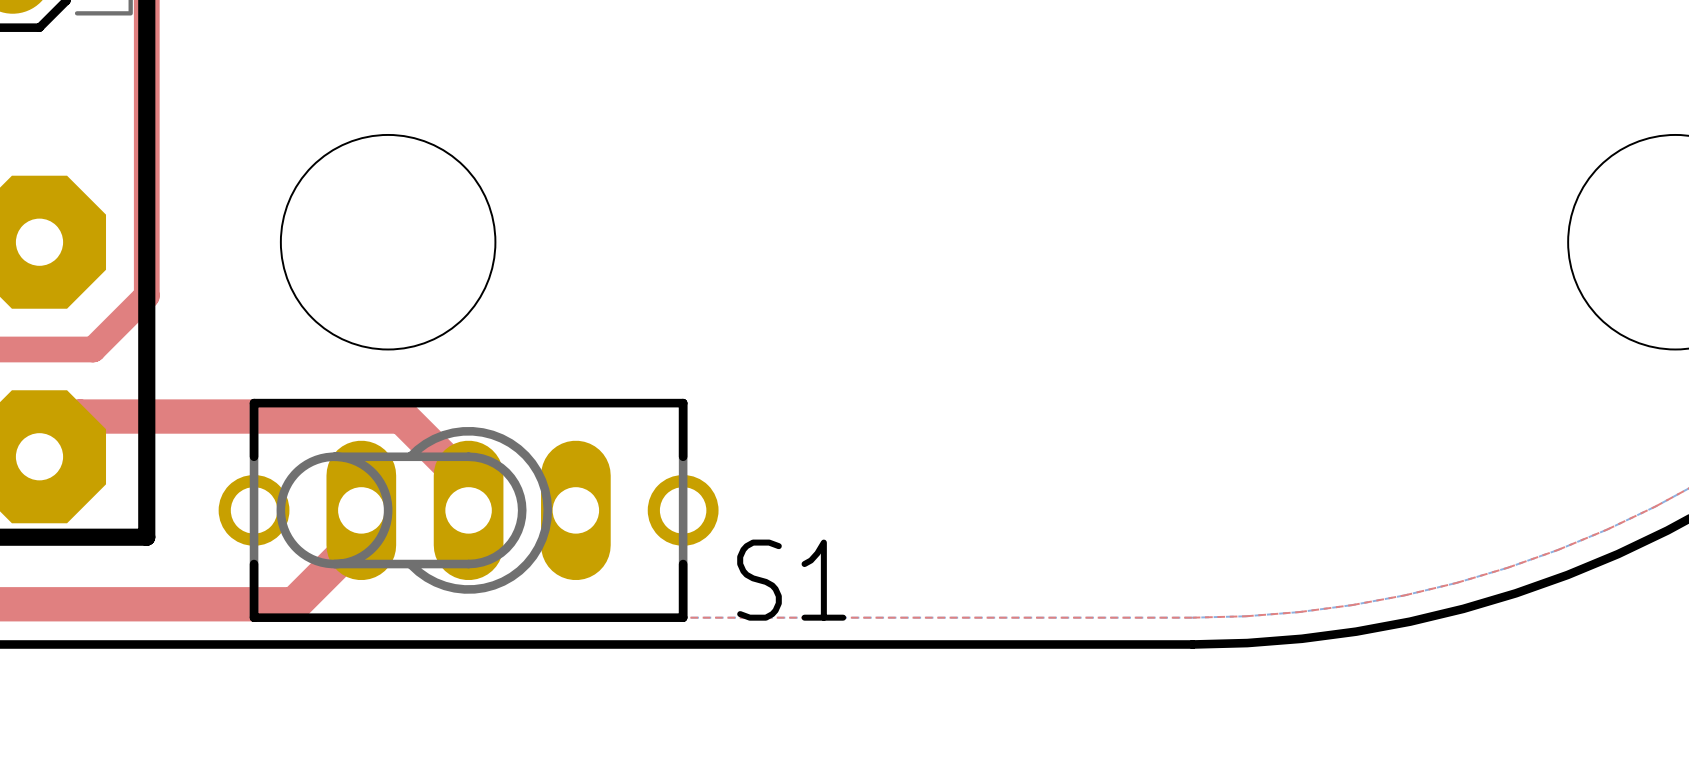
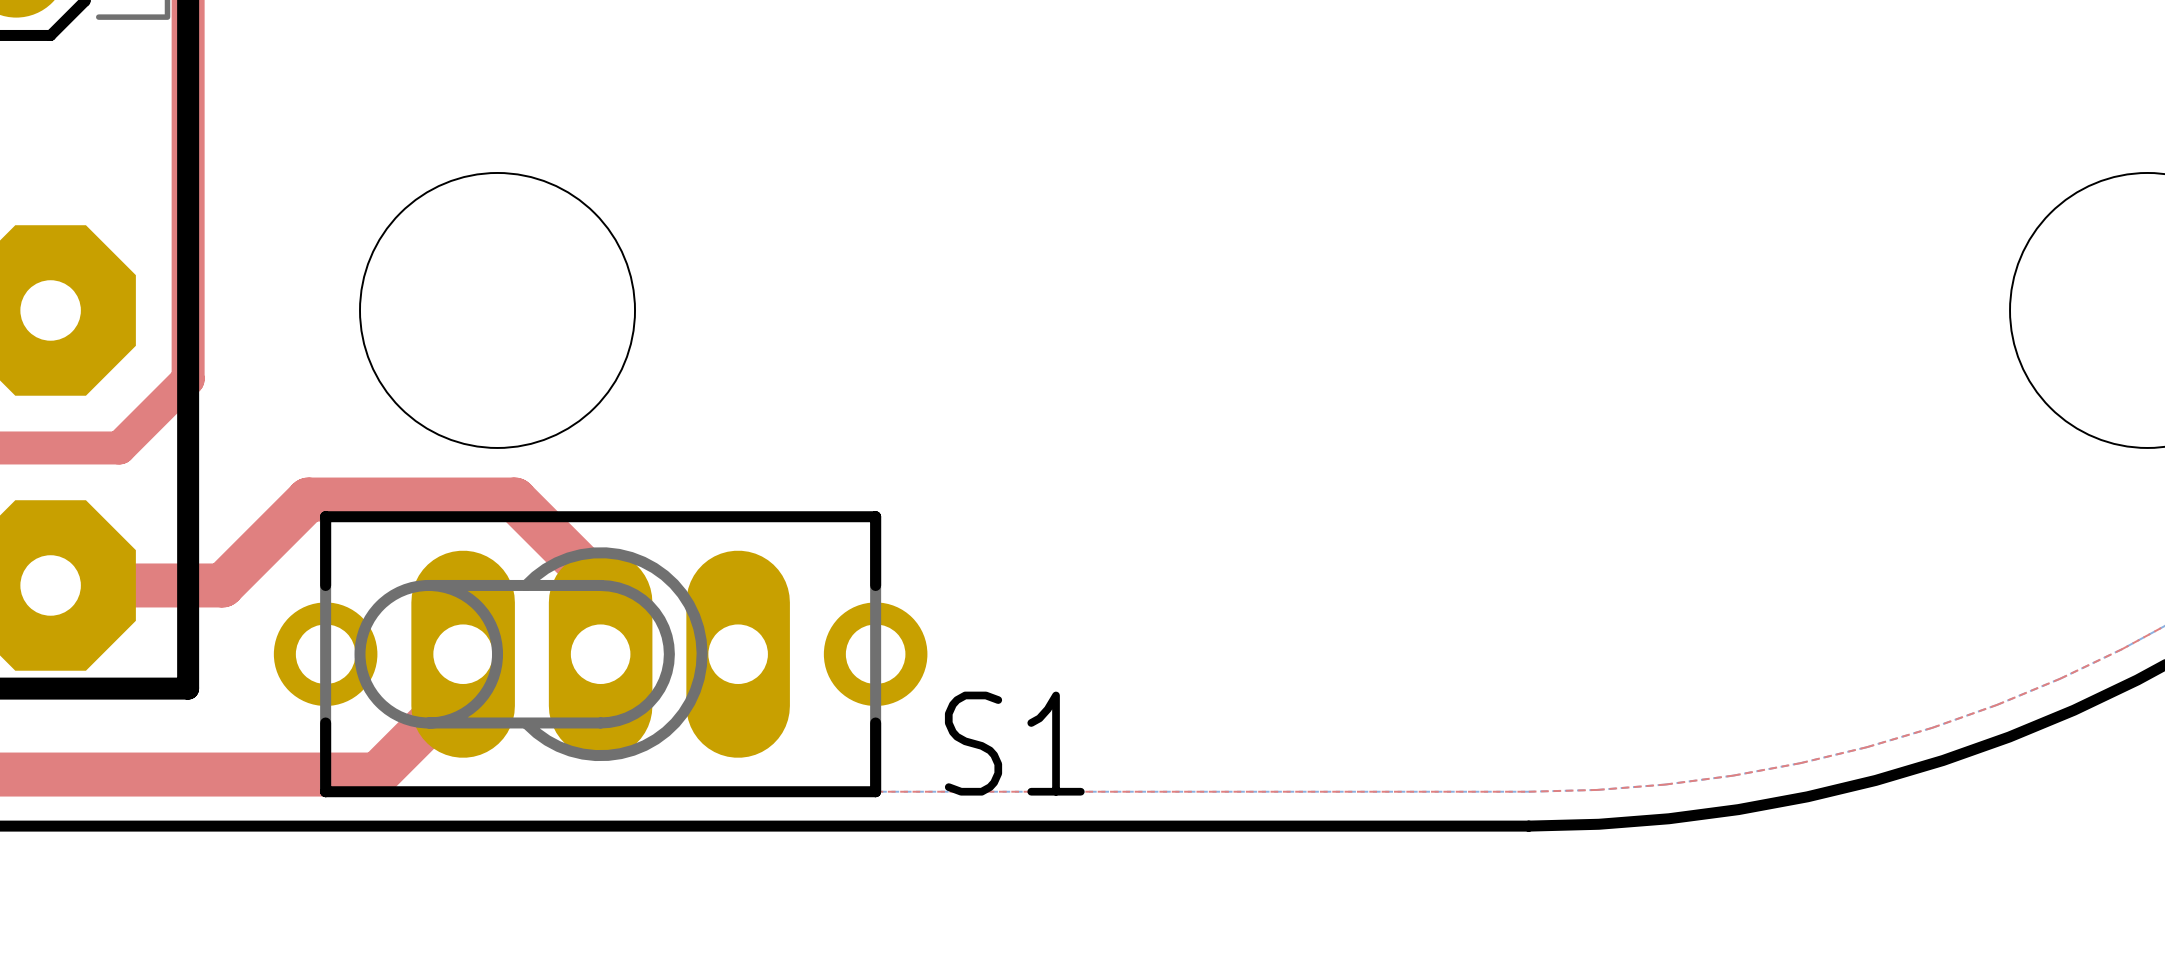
S1 footprint: [218, 398, 719, 622] -> [273, 511, 928, 798]
top track: (39, 456) (79, 416) (401, 416) (468, 483) -> (50, 585) (222, 585) (308, 499) (514, 499) (600, 585) (600, 619)

